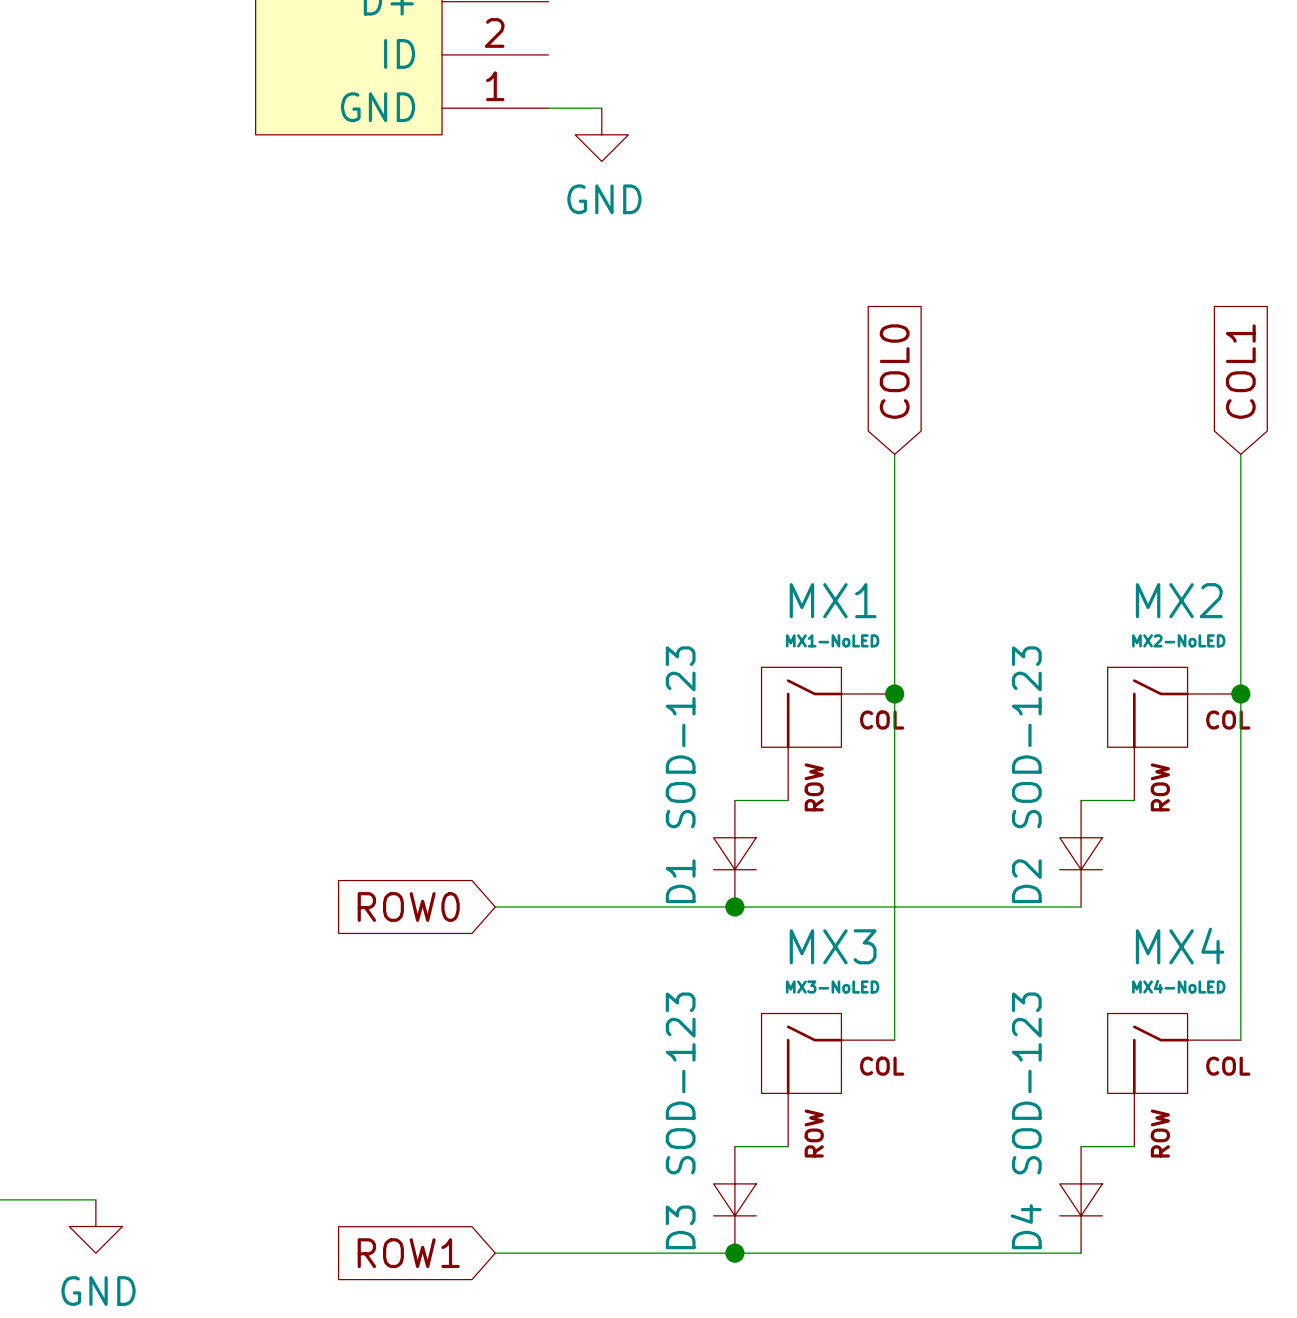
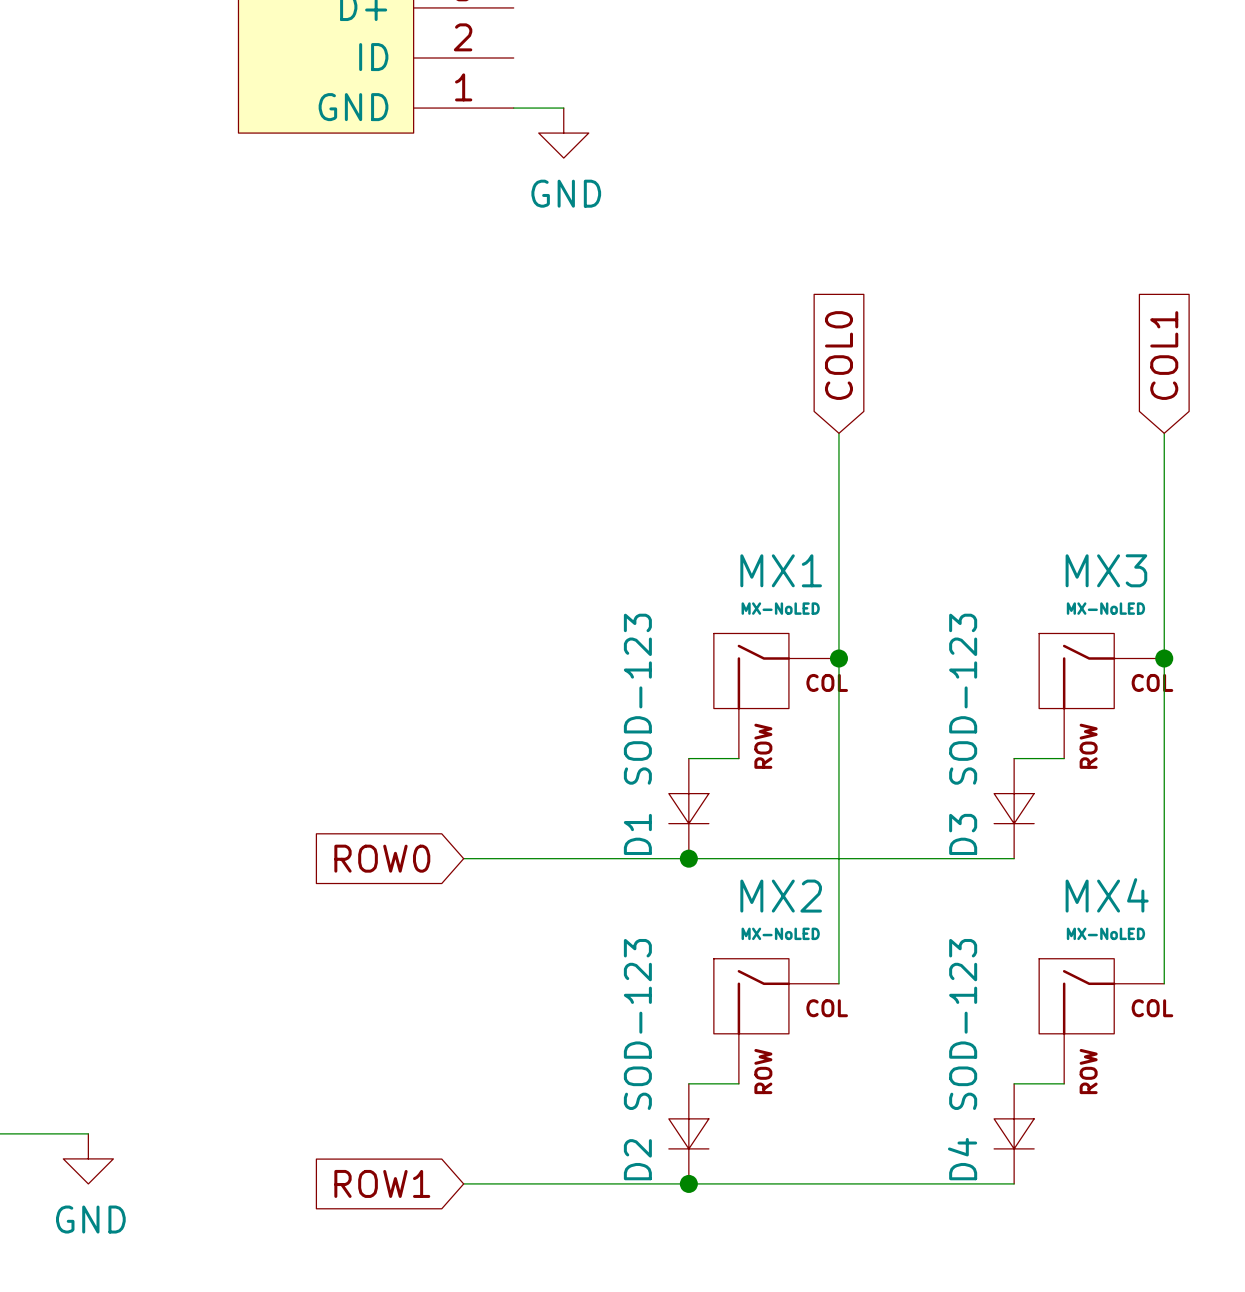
MX2 name: MX2 (1179, 600) -> MX3 (1106, 570)
MX1 value: MX1-NoLED (832, 640) -> MX-NoLED (780, 608)
MX2 value: MX2-NoLED (1178, 640) -> MX-NoLED (1105, 608)
D2 name: D2 (1026, 881) -> D3 (963, 834)
MX3 name: MX3 (833, 946) -> MX2 (781, 896)
MX4 value: MX4-NoLED (1178, 986) -> MX-NoLED (1105, 933)
MX3 value: MX3-NoLED (832, 987) -> MX-NoLED (780, 933)
D3 name: D3 (680, 1227) -> D2 (637, 1159)

